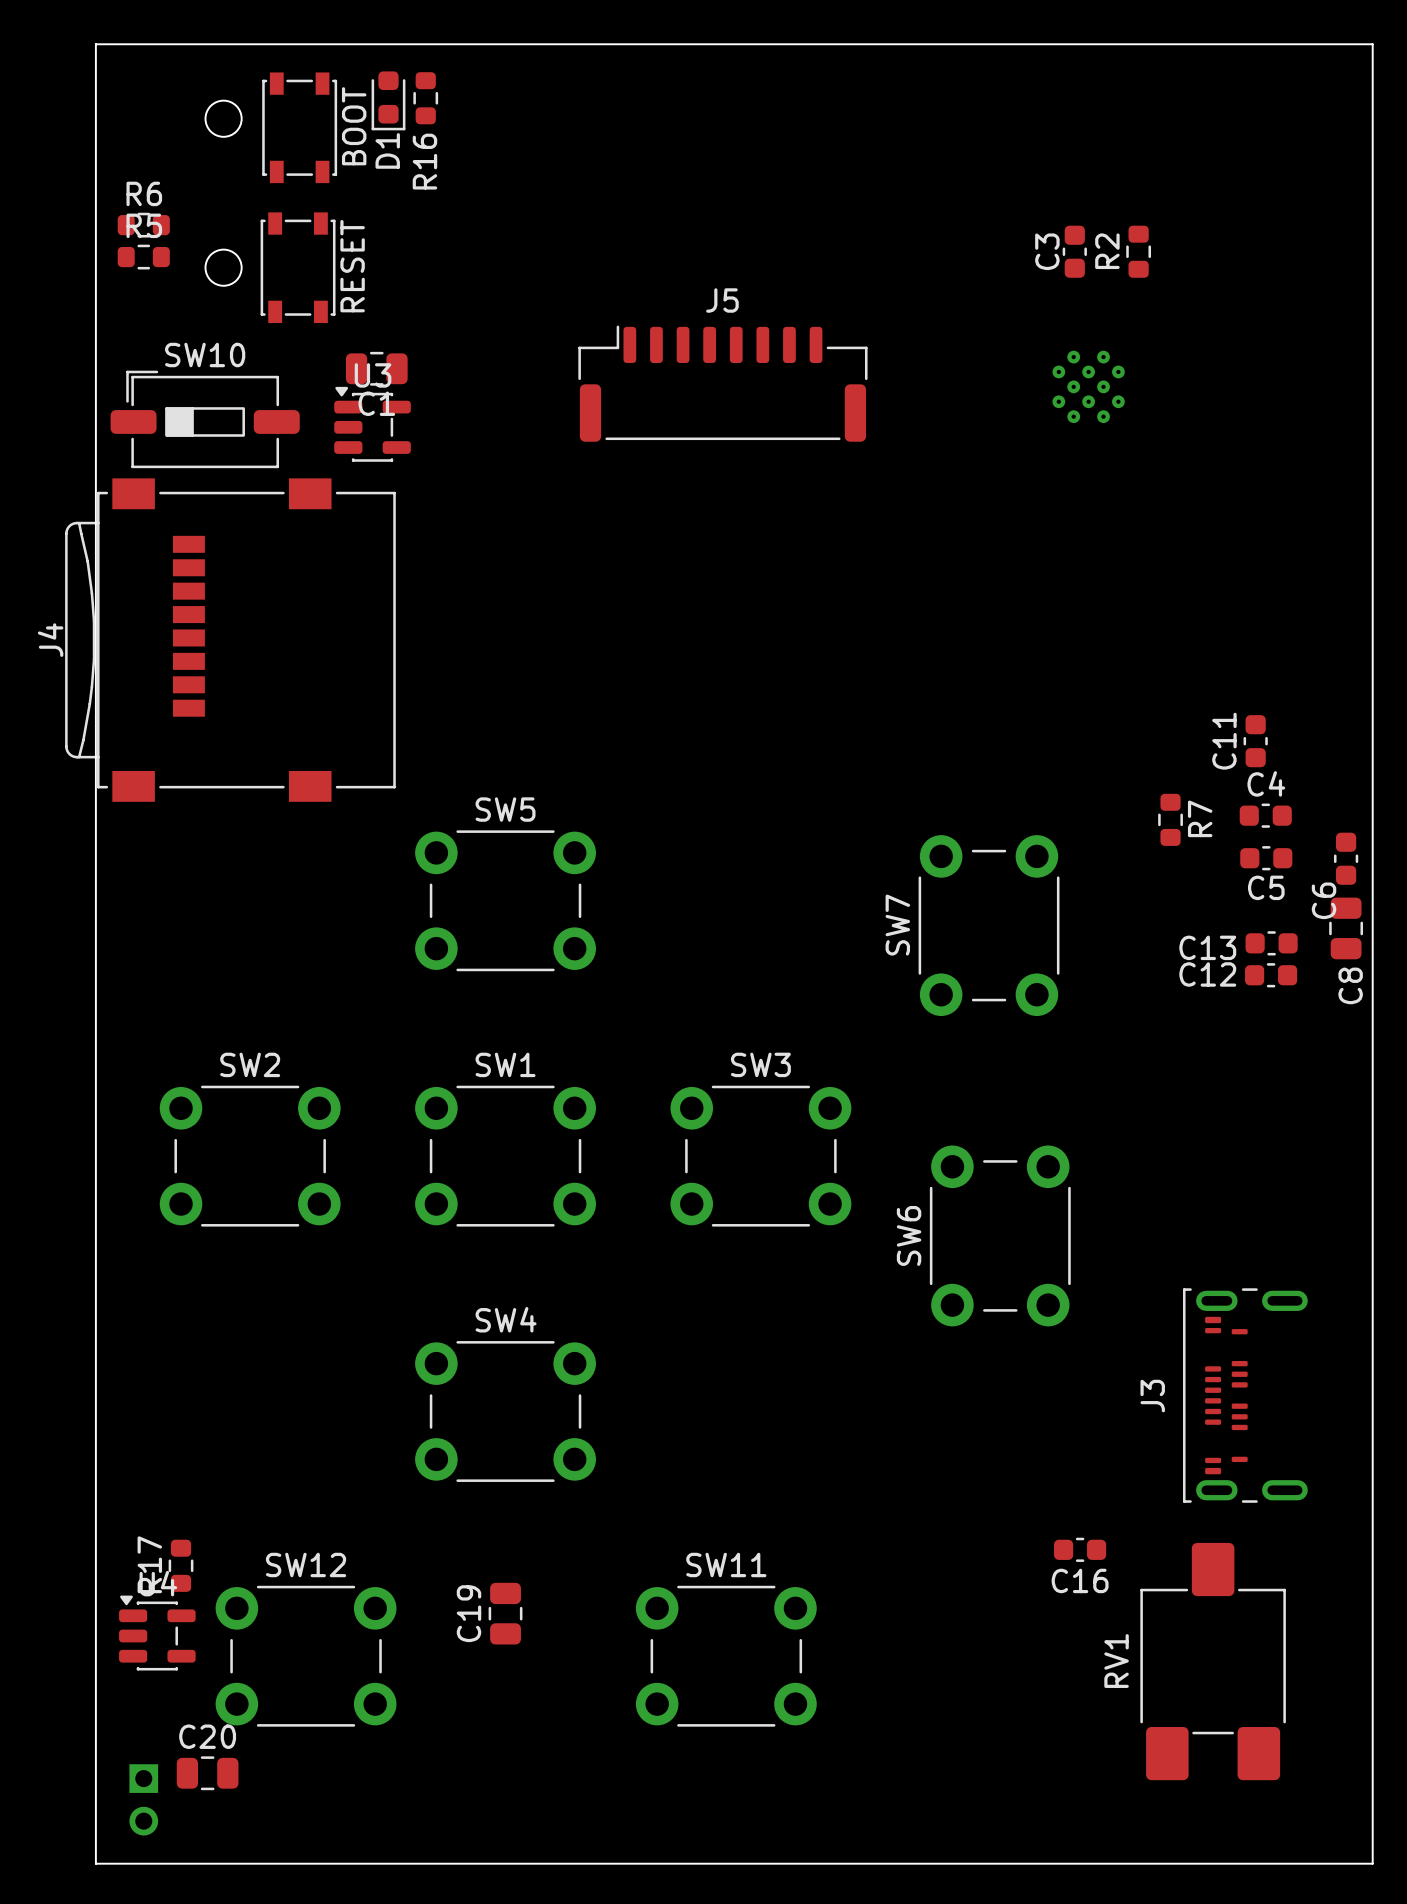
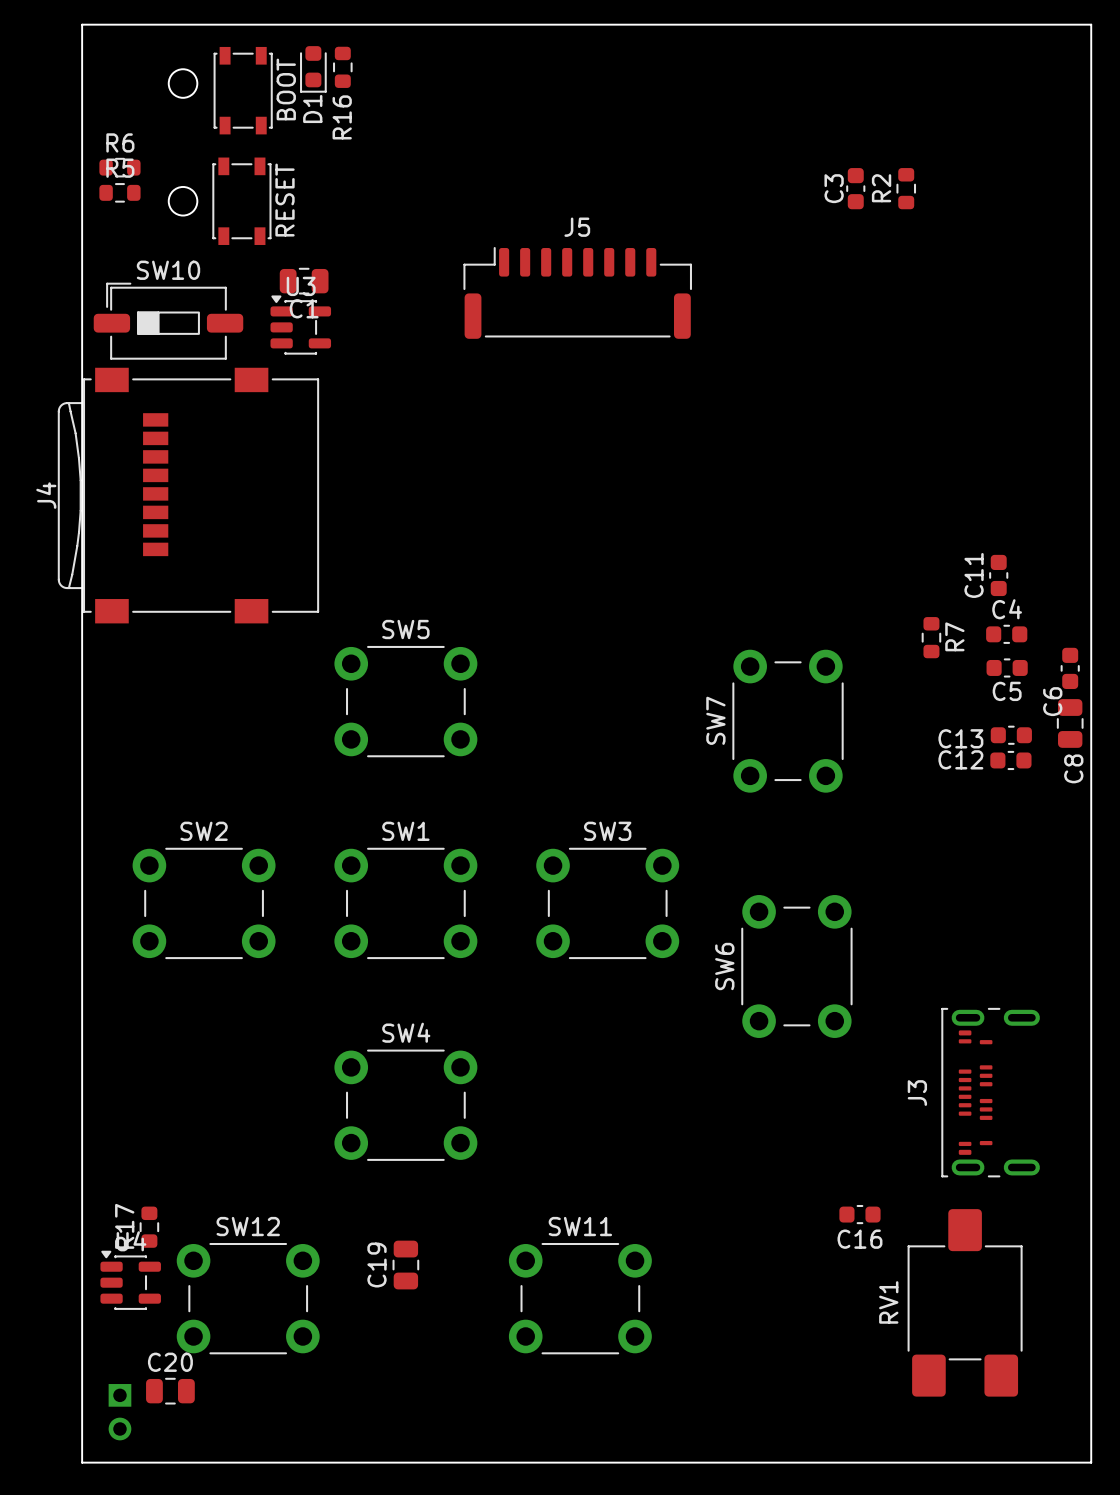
part: (1088, 386) -> none

